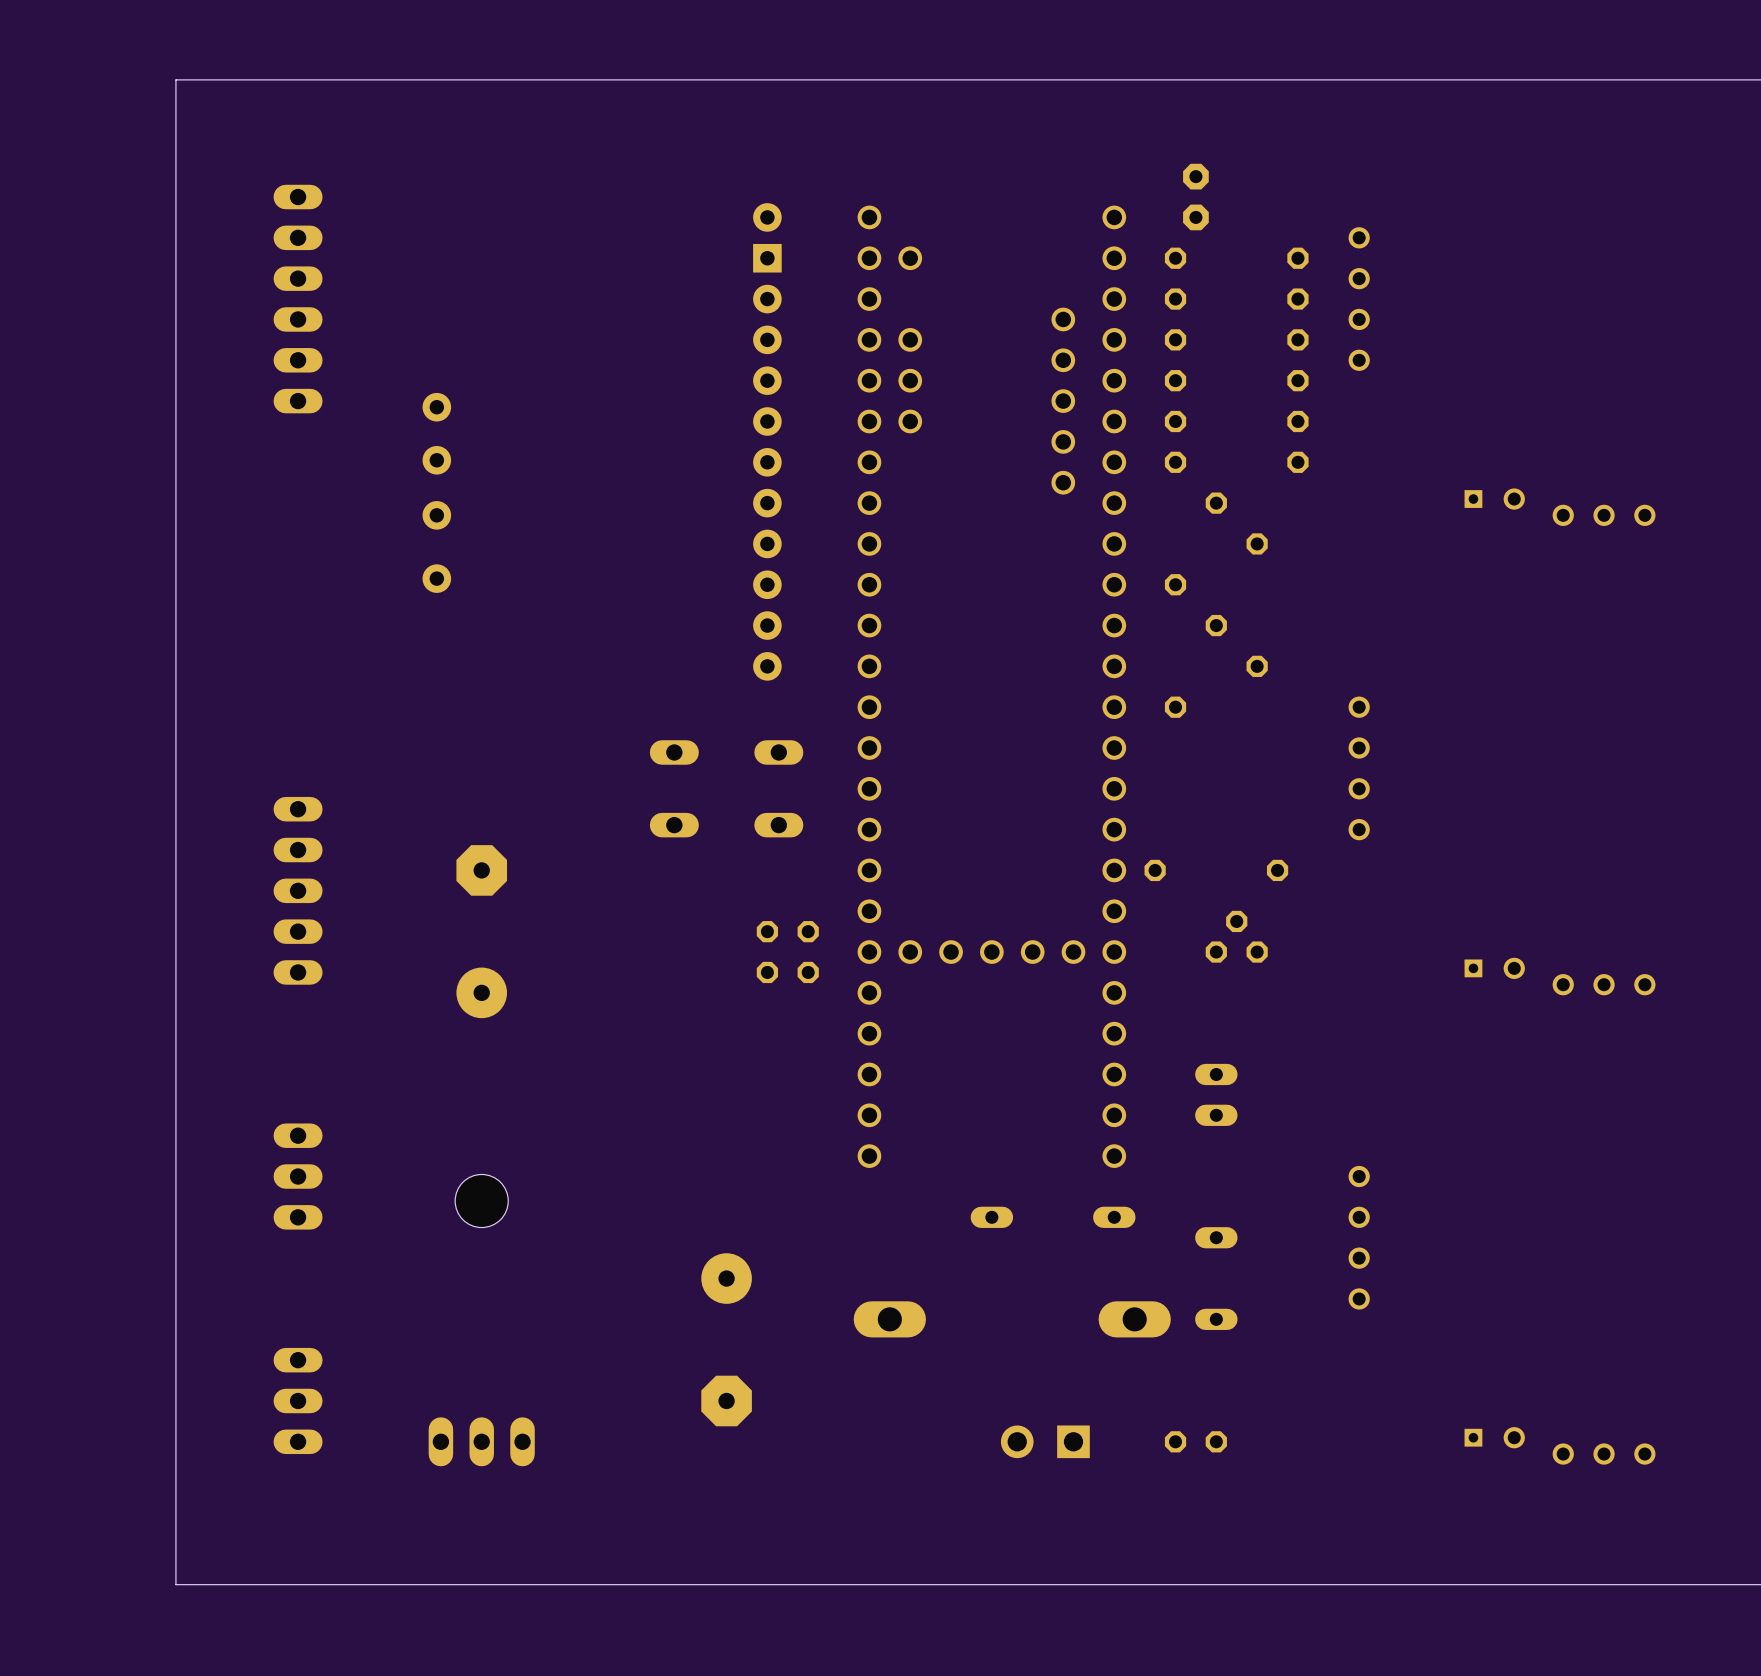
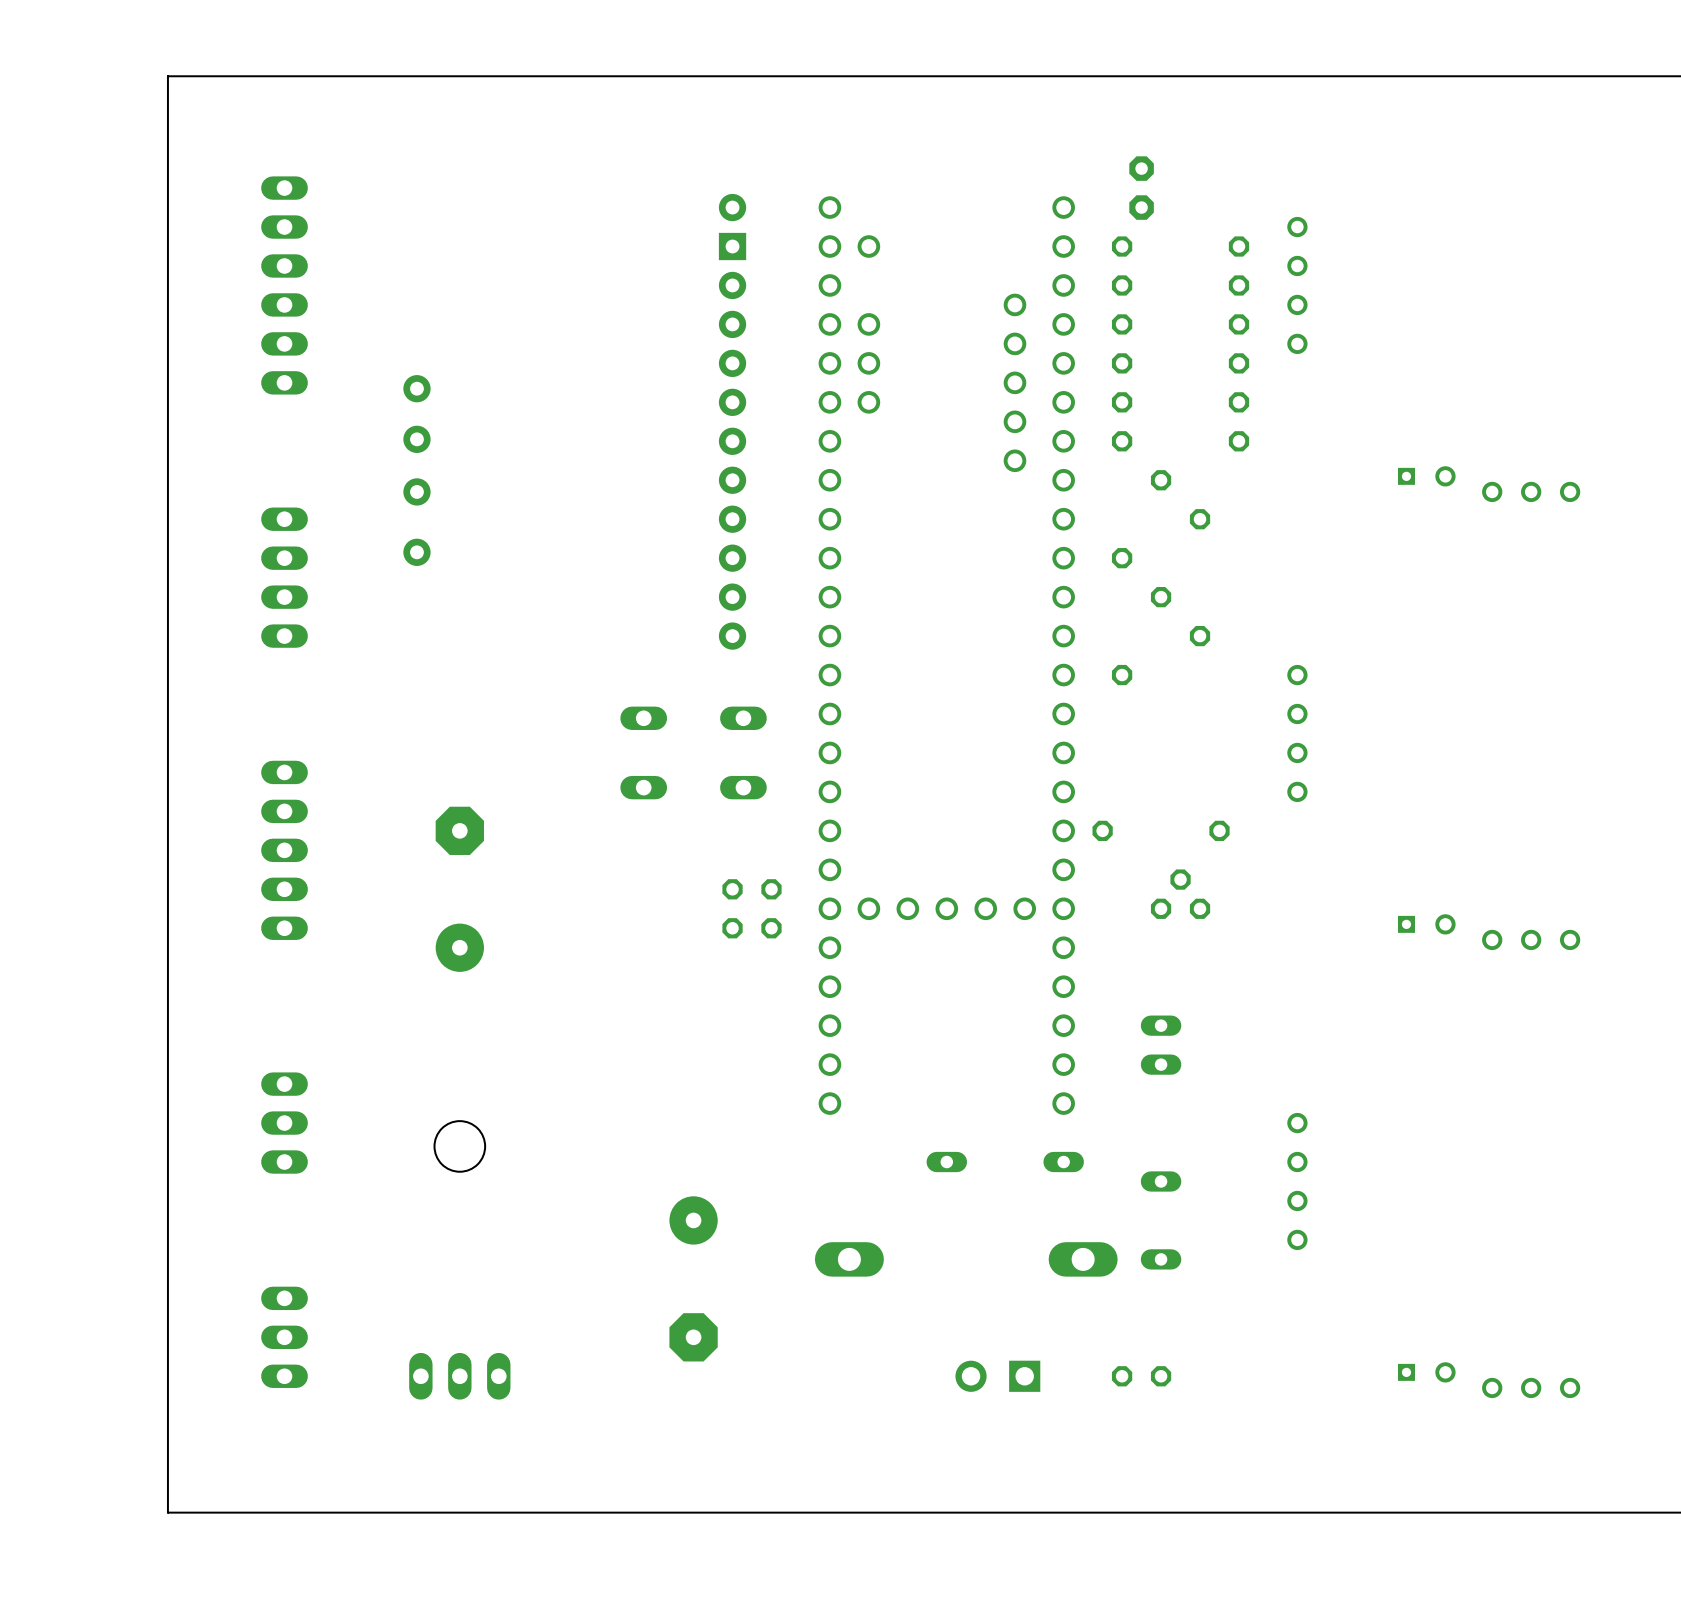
part: none -> (284, 577)

